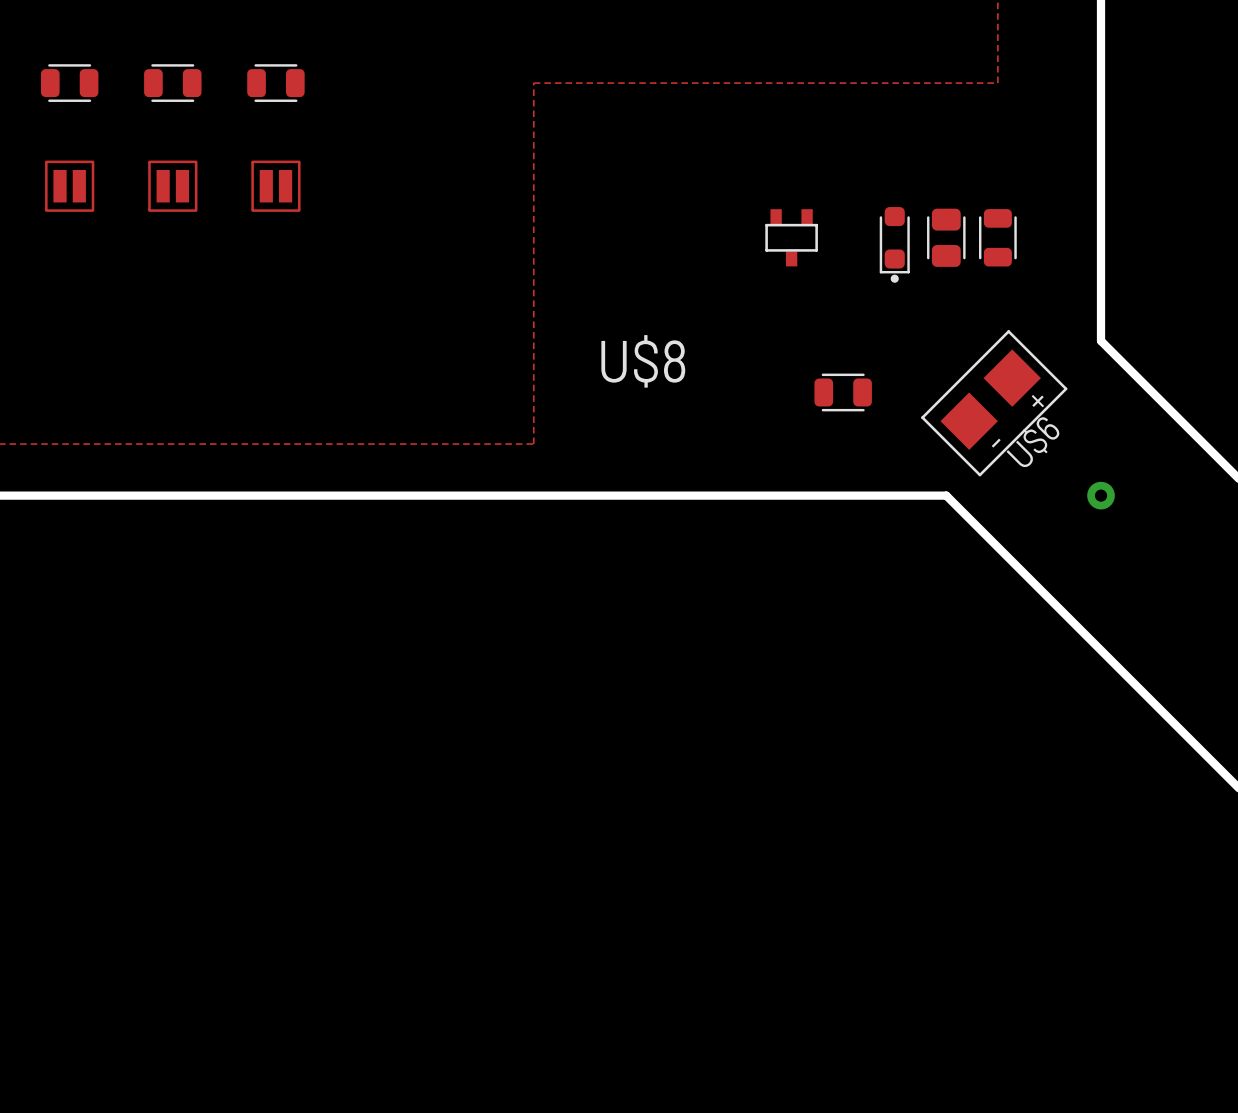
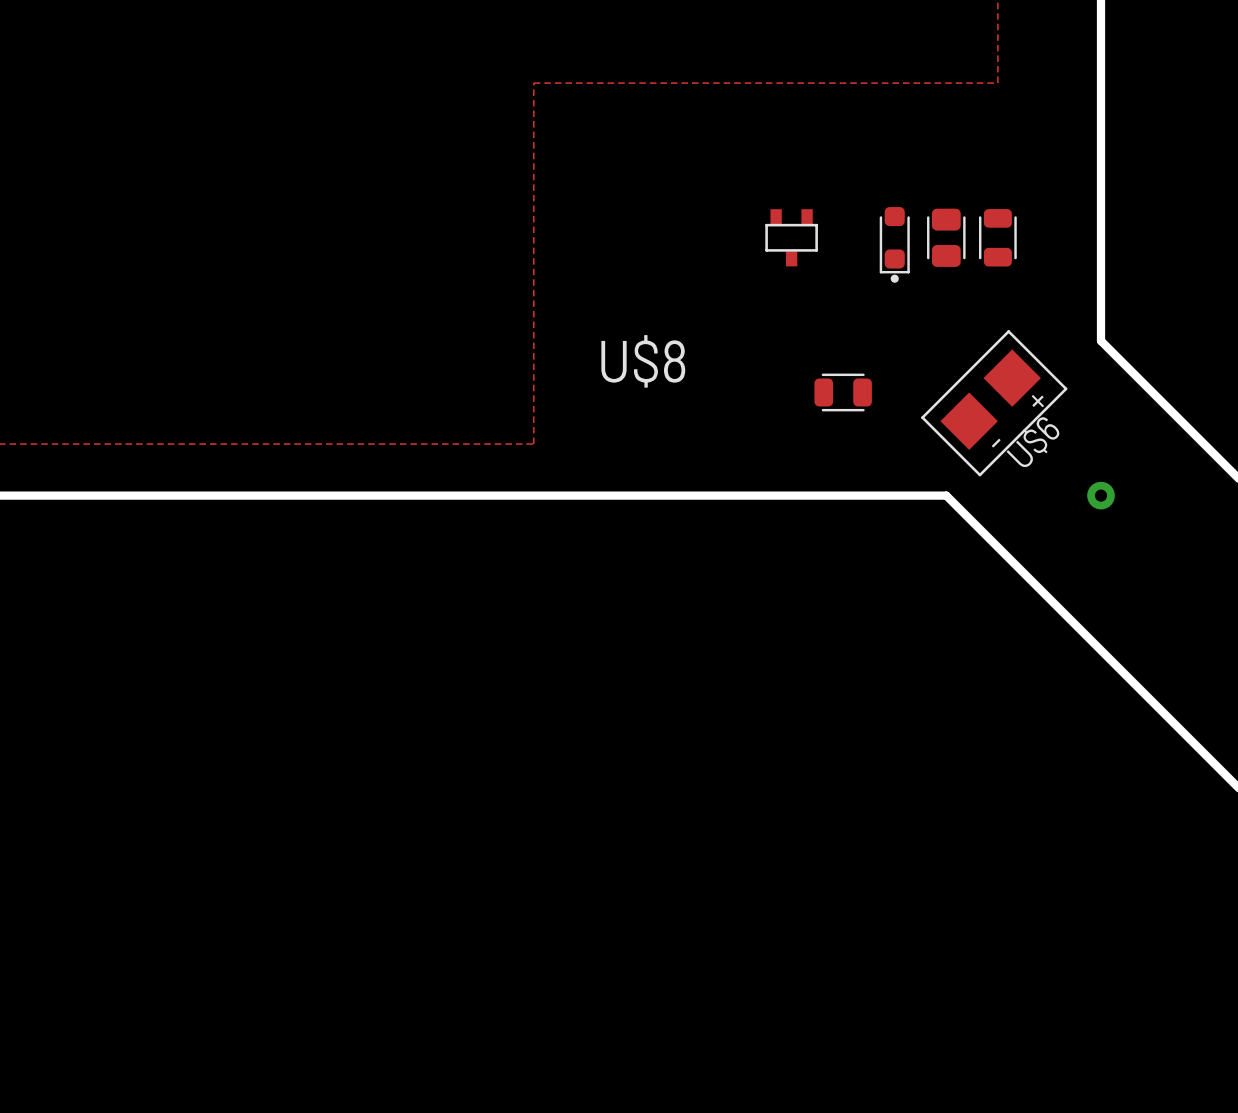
part: (69, 83) -> none
part: (172, 83) -> none
part: (275, 83) -> none
part: (69, 186) -> none
part: (172, 186) -> none
part: (275, 186) -> none

